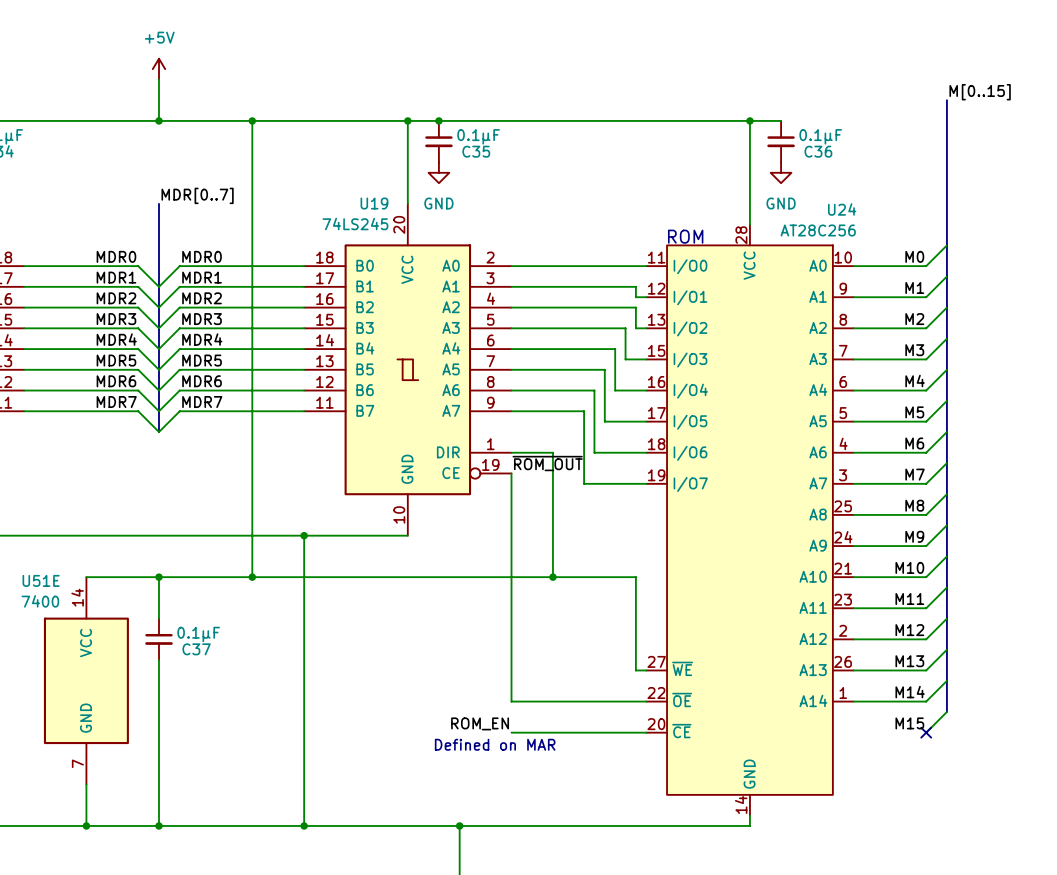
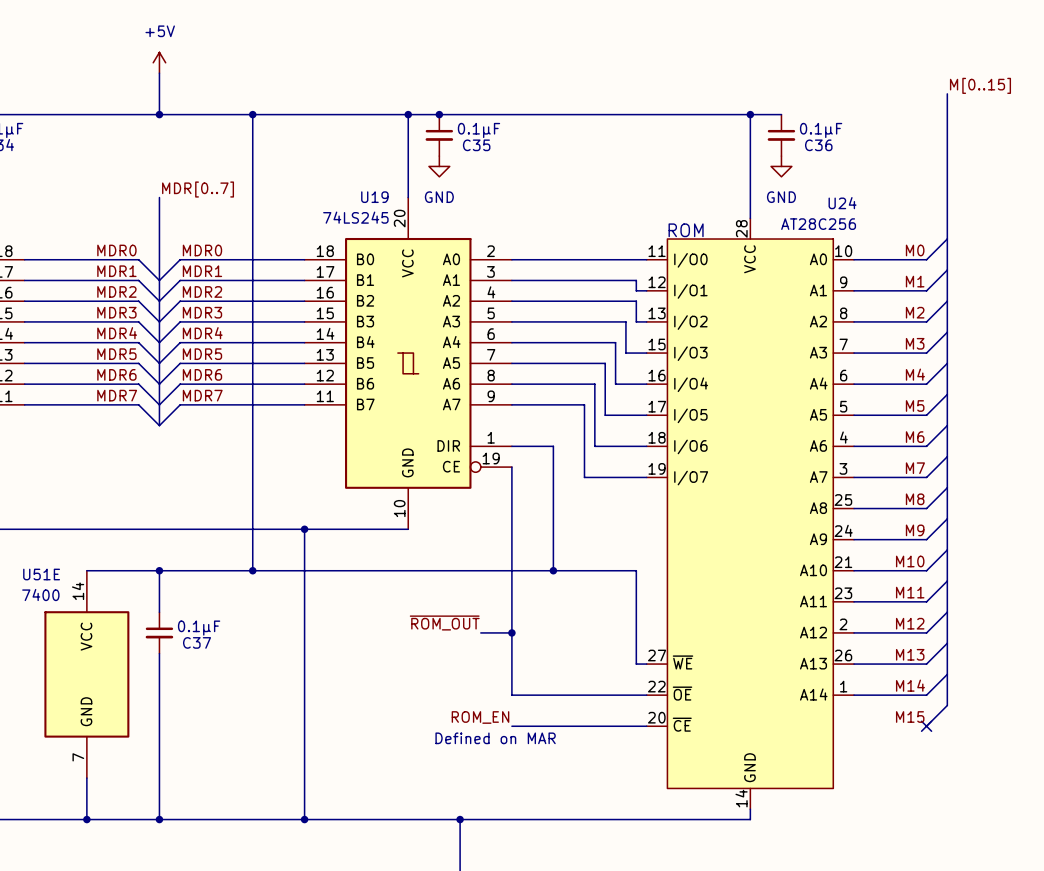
label position: ~{ROM_OUT} (547, 463) -> ~{ROM_OUT} (444, 623)
wire: none -> (480, 632) (511, 632)
junction: none -> (511, 632)

